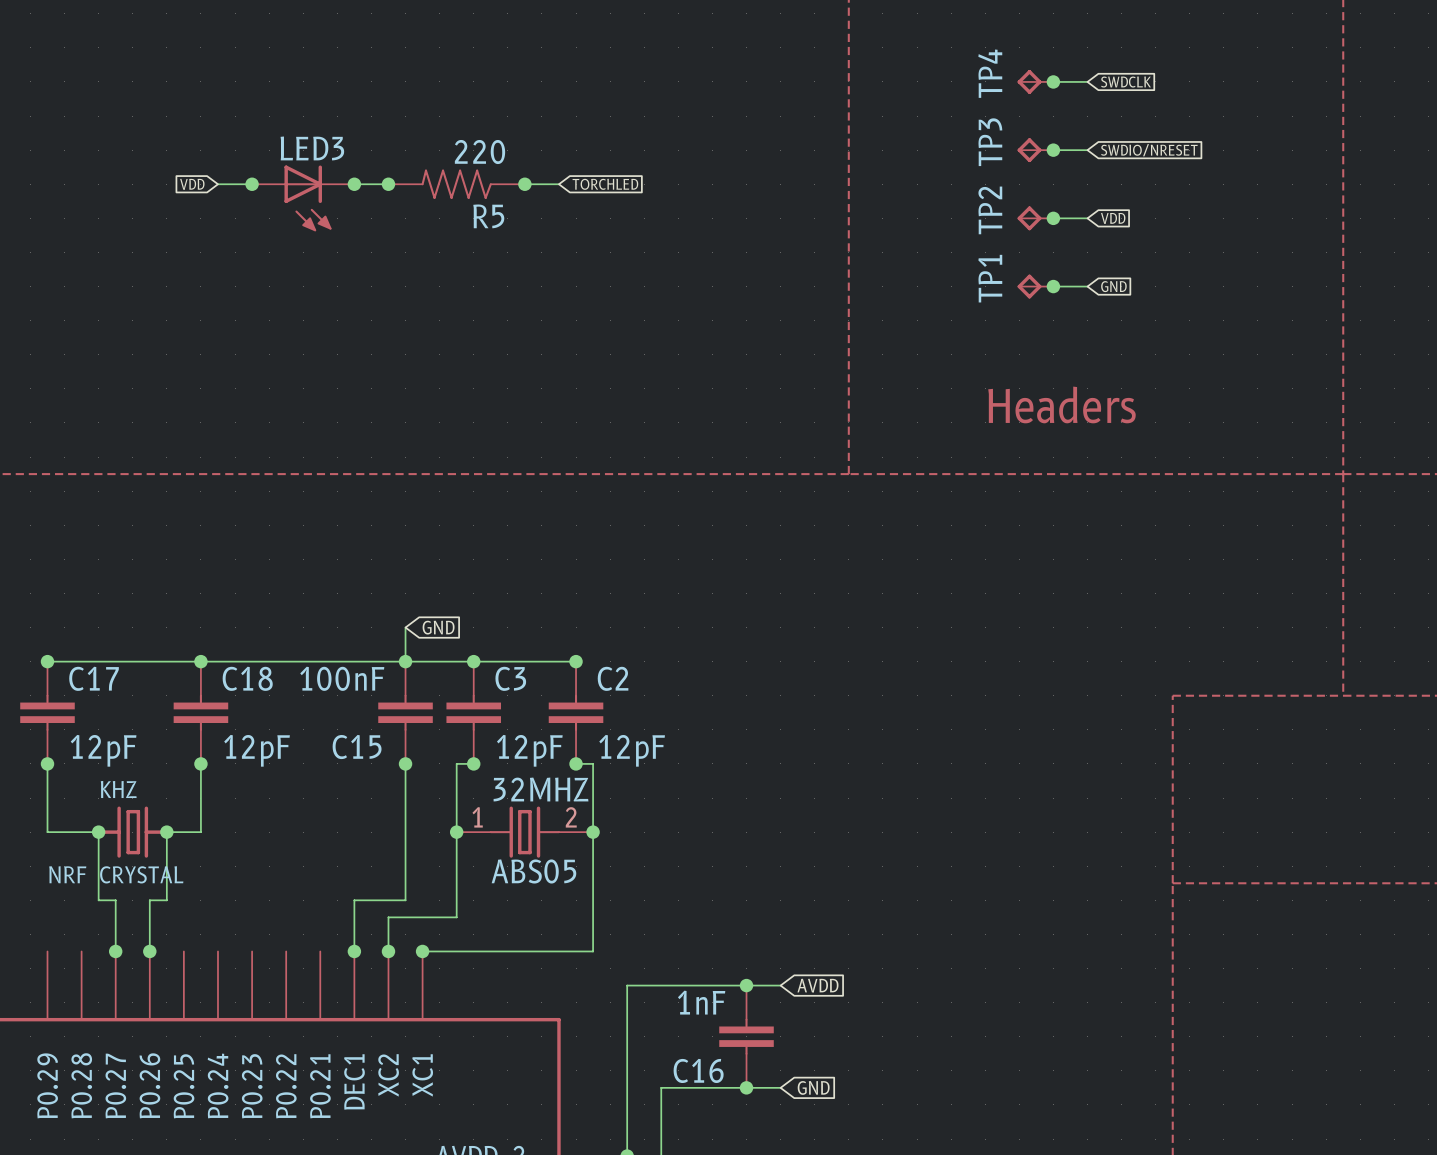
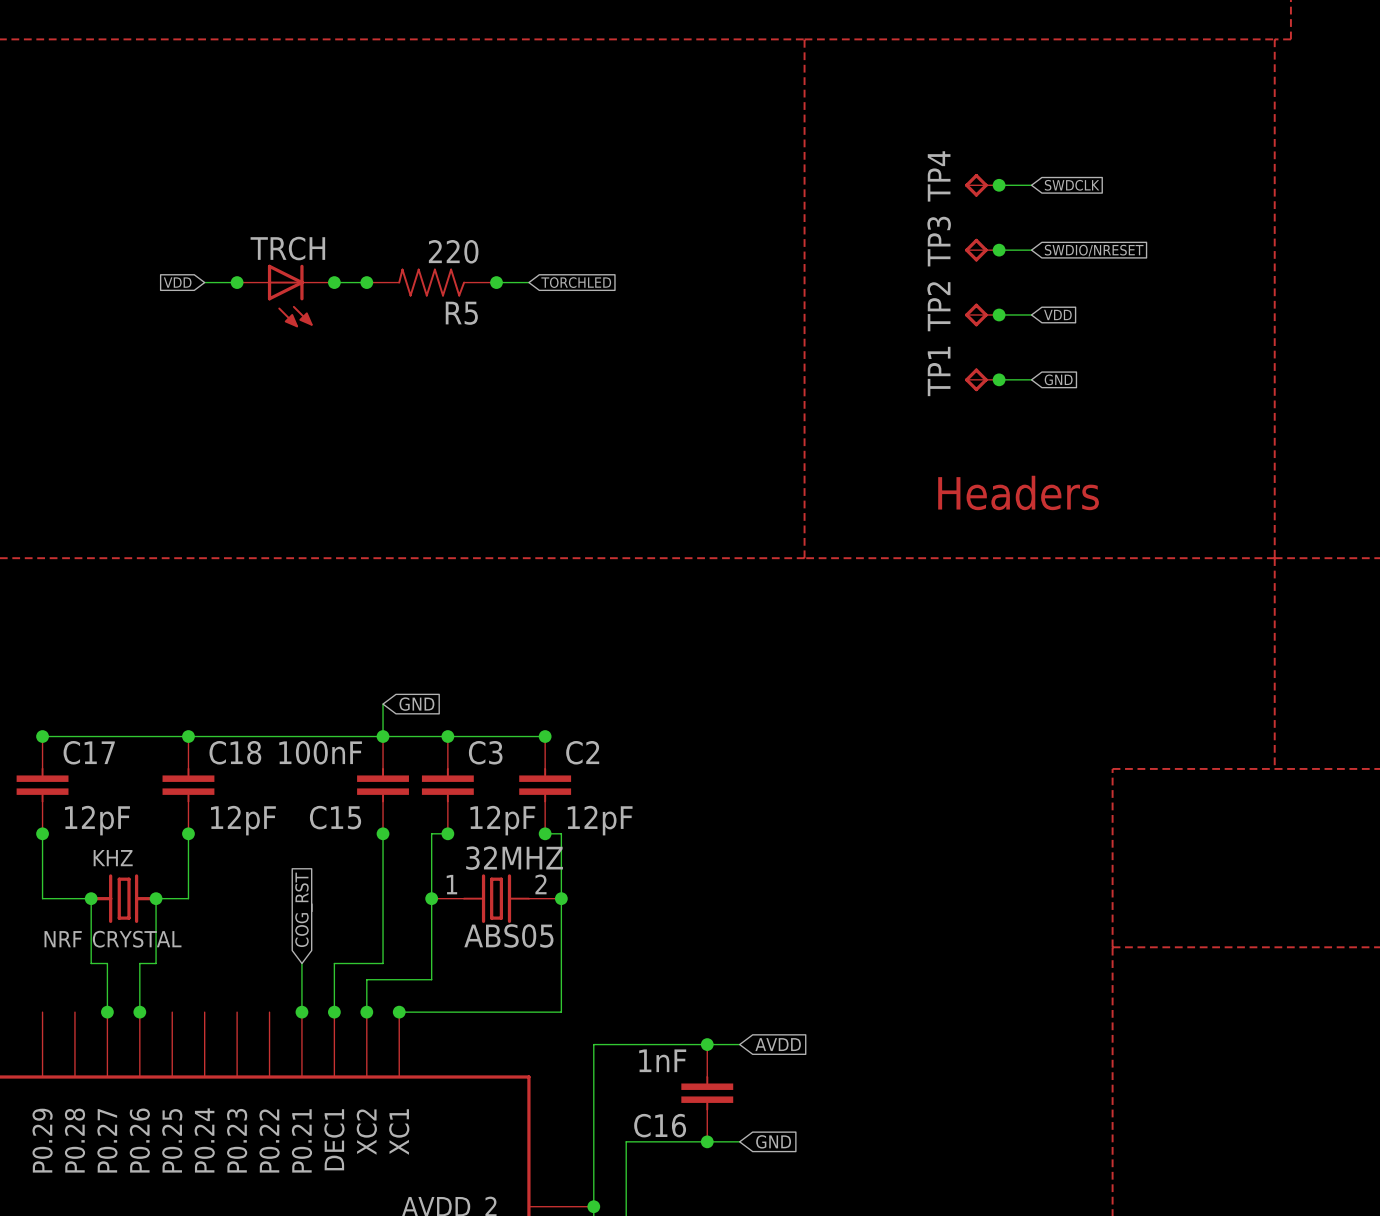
LED3 name: LED3 (312, 148) -> TRCH (287, 248)
global label: none -> COG_RST (303, 909)
wire: none -> (301, 963) (301, 1012)
junction: none -> (301, 1012)

